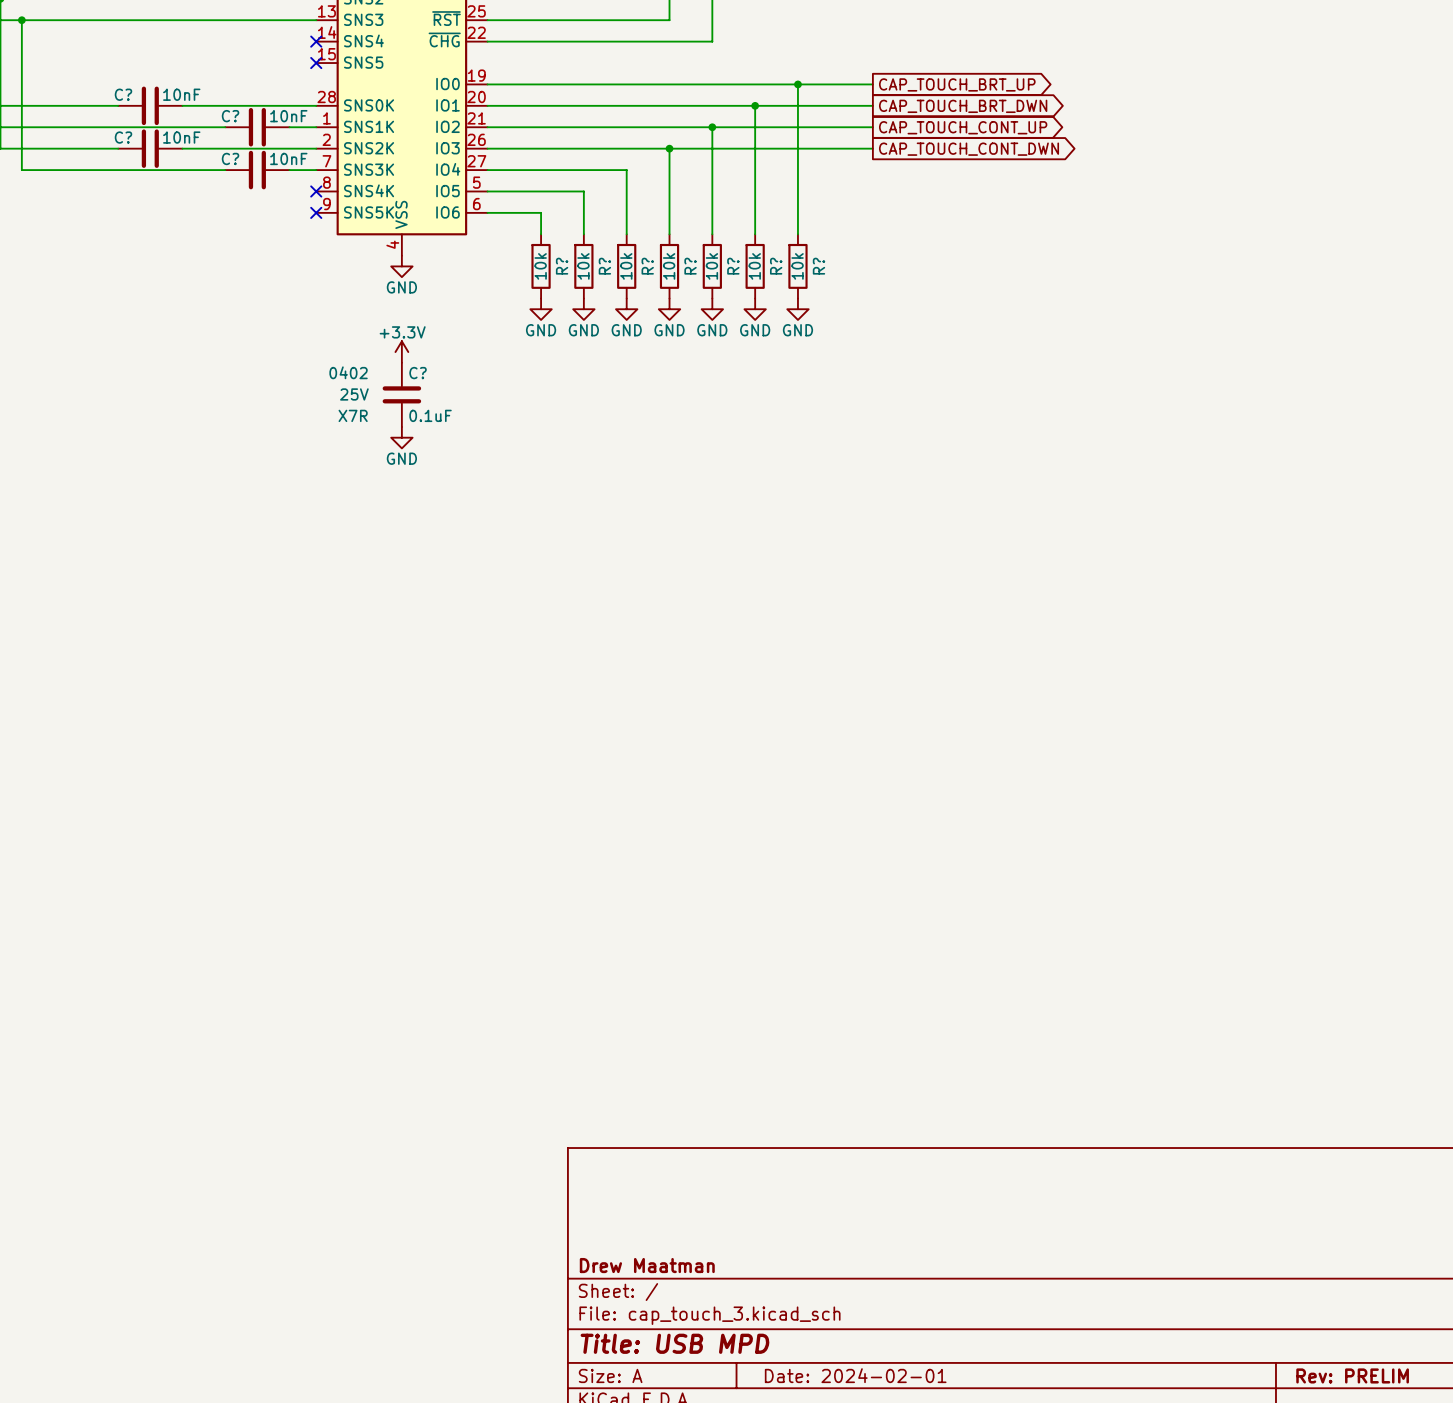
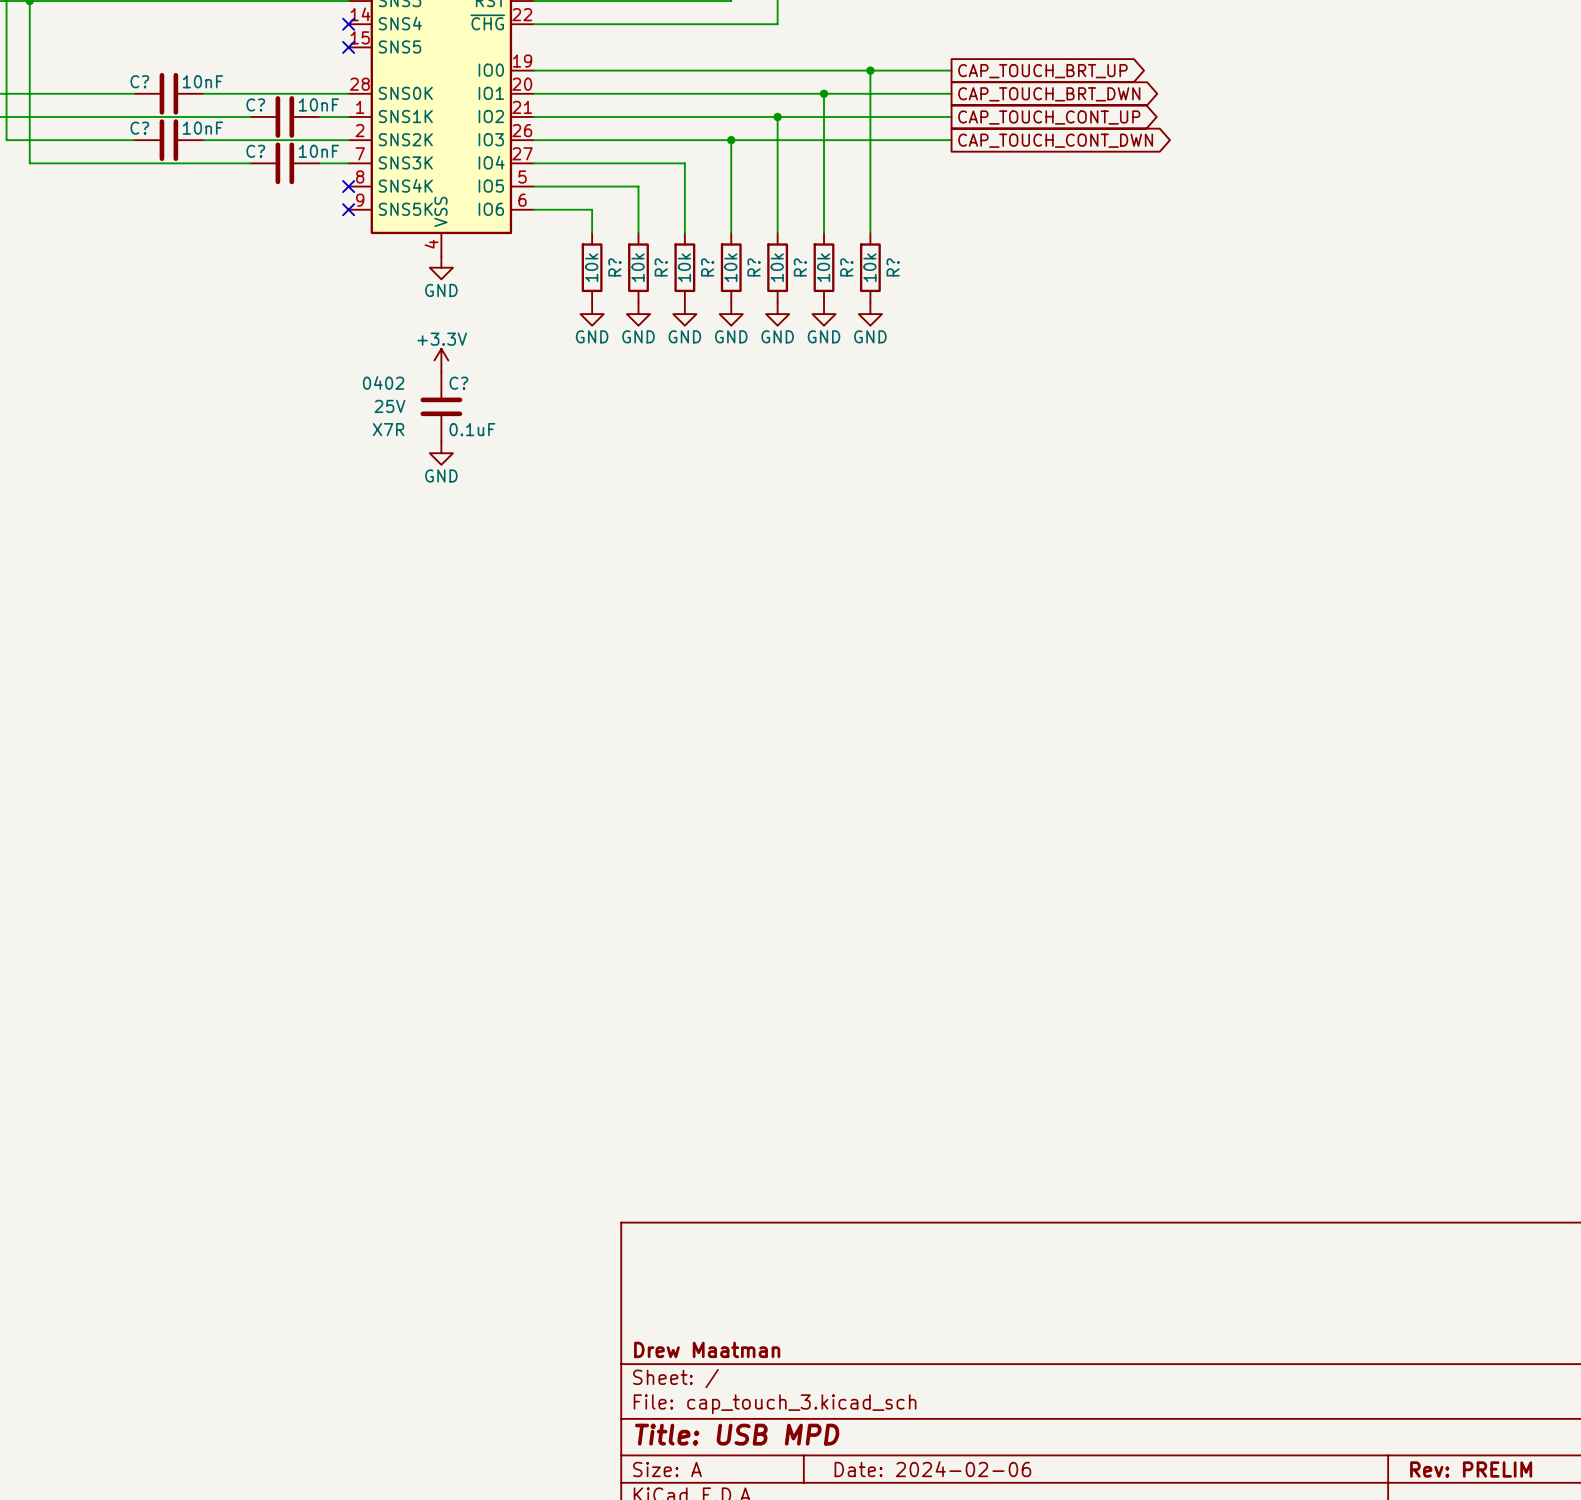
title block: Date: 2024-02-01 (855, 1375) -> Date: 2024-02-06 (932, 1469)

